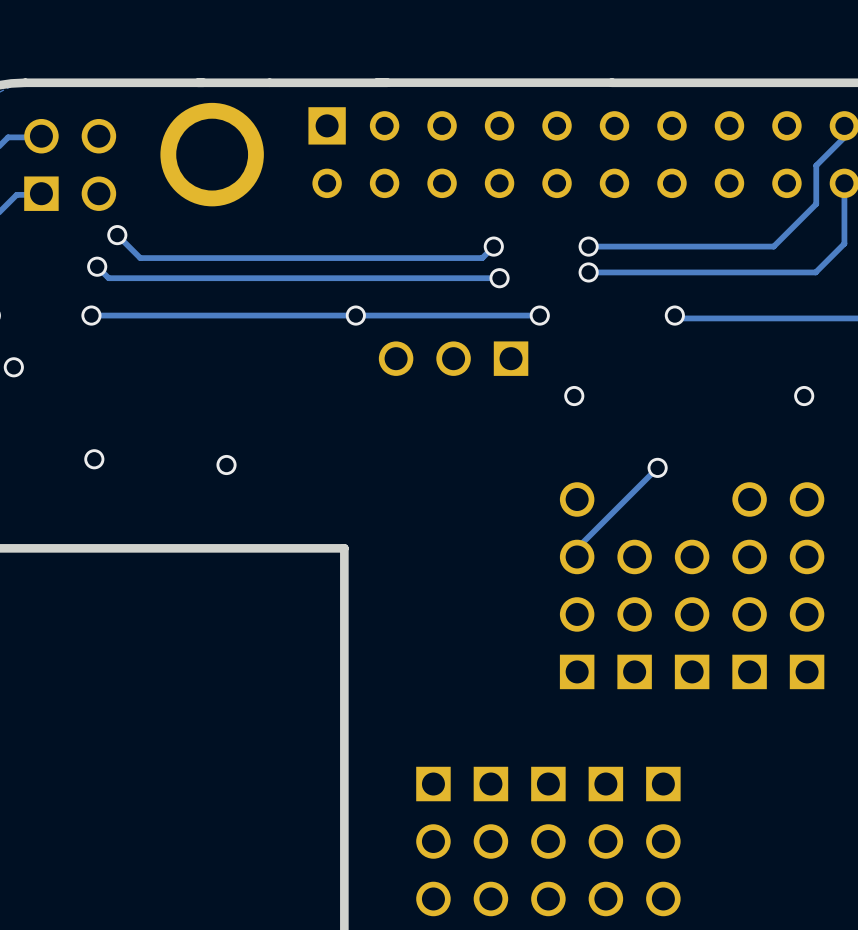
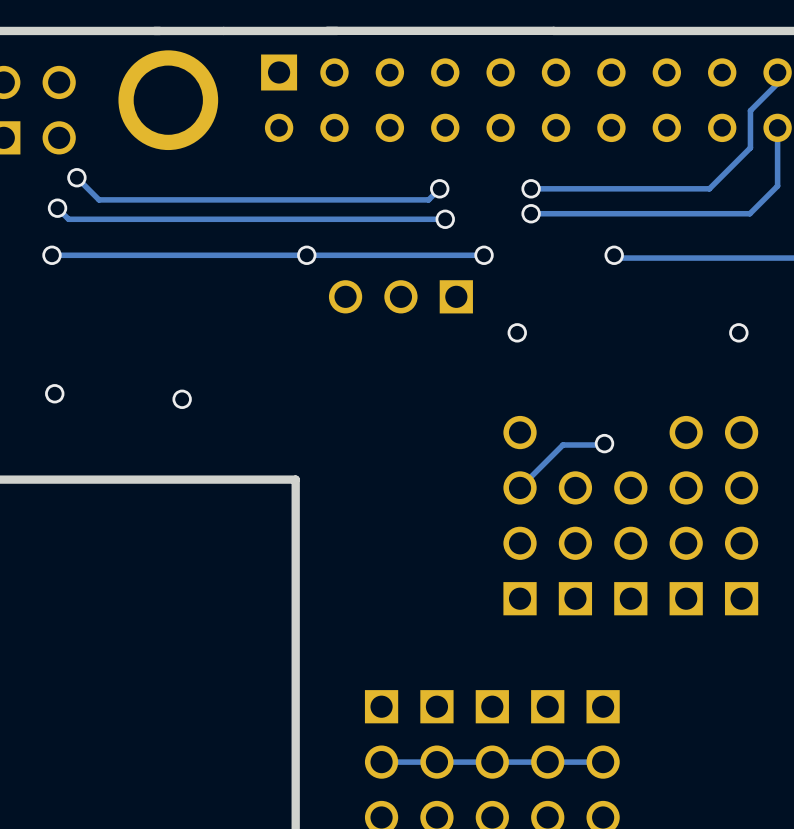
track: (657, 467) (577, 548) (577, 556) -> (604, 443) (562, 444) (520, 487)
via position: (657, 467) -> (604, 443)
track: none -> (603, 762) (381, 762)

